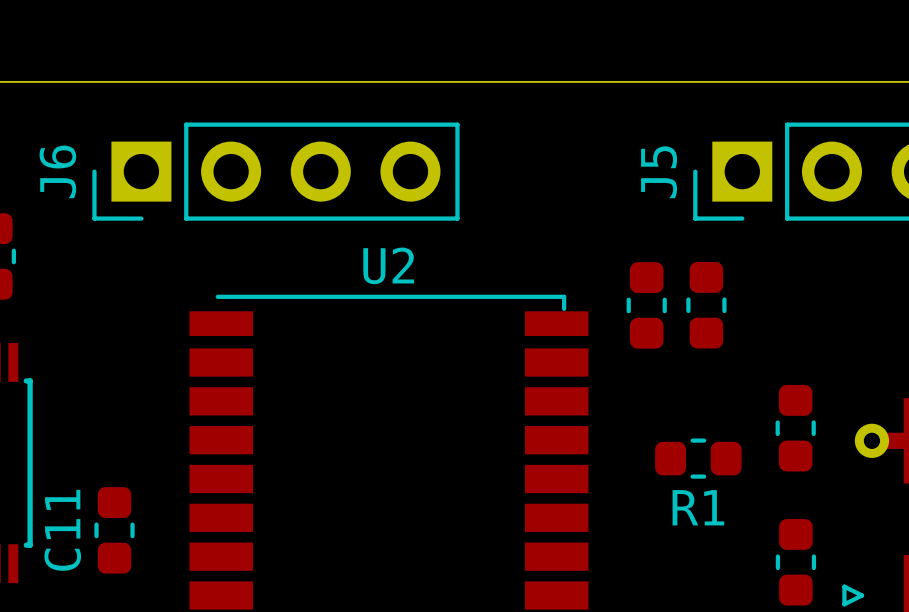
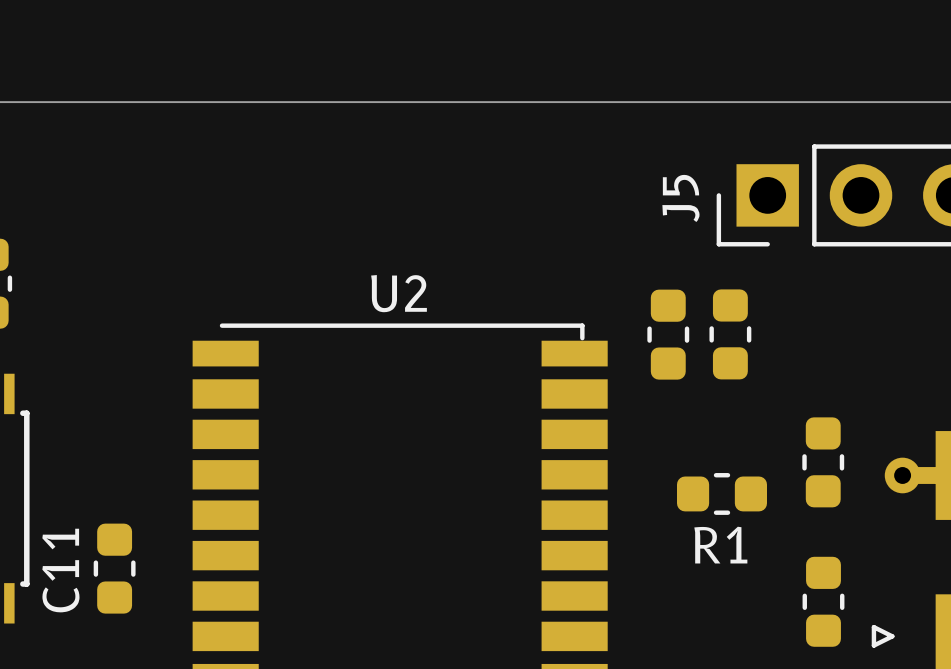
J6: (275, 171) -> none

